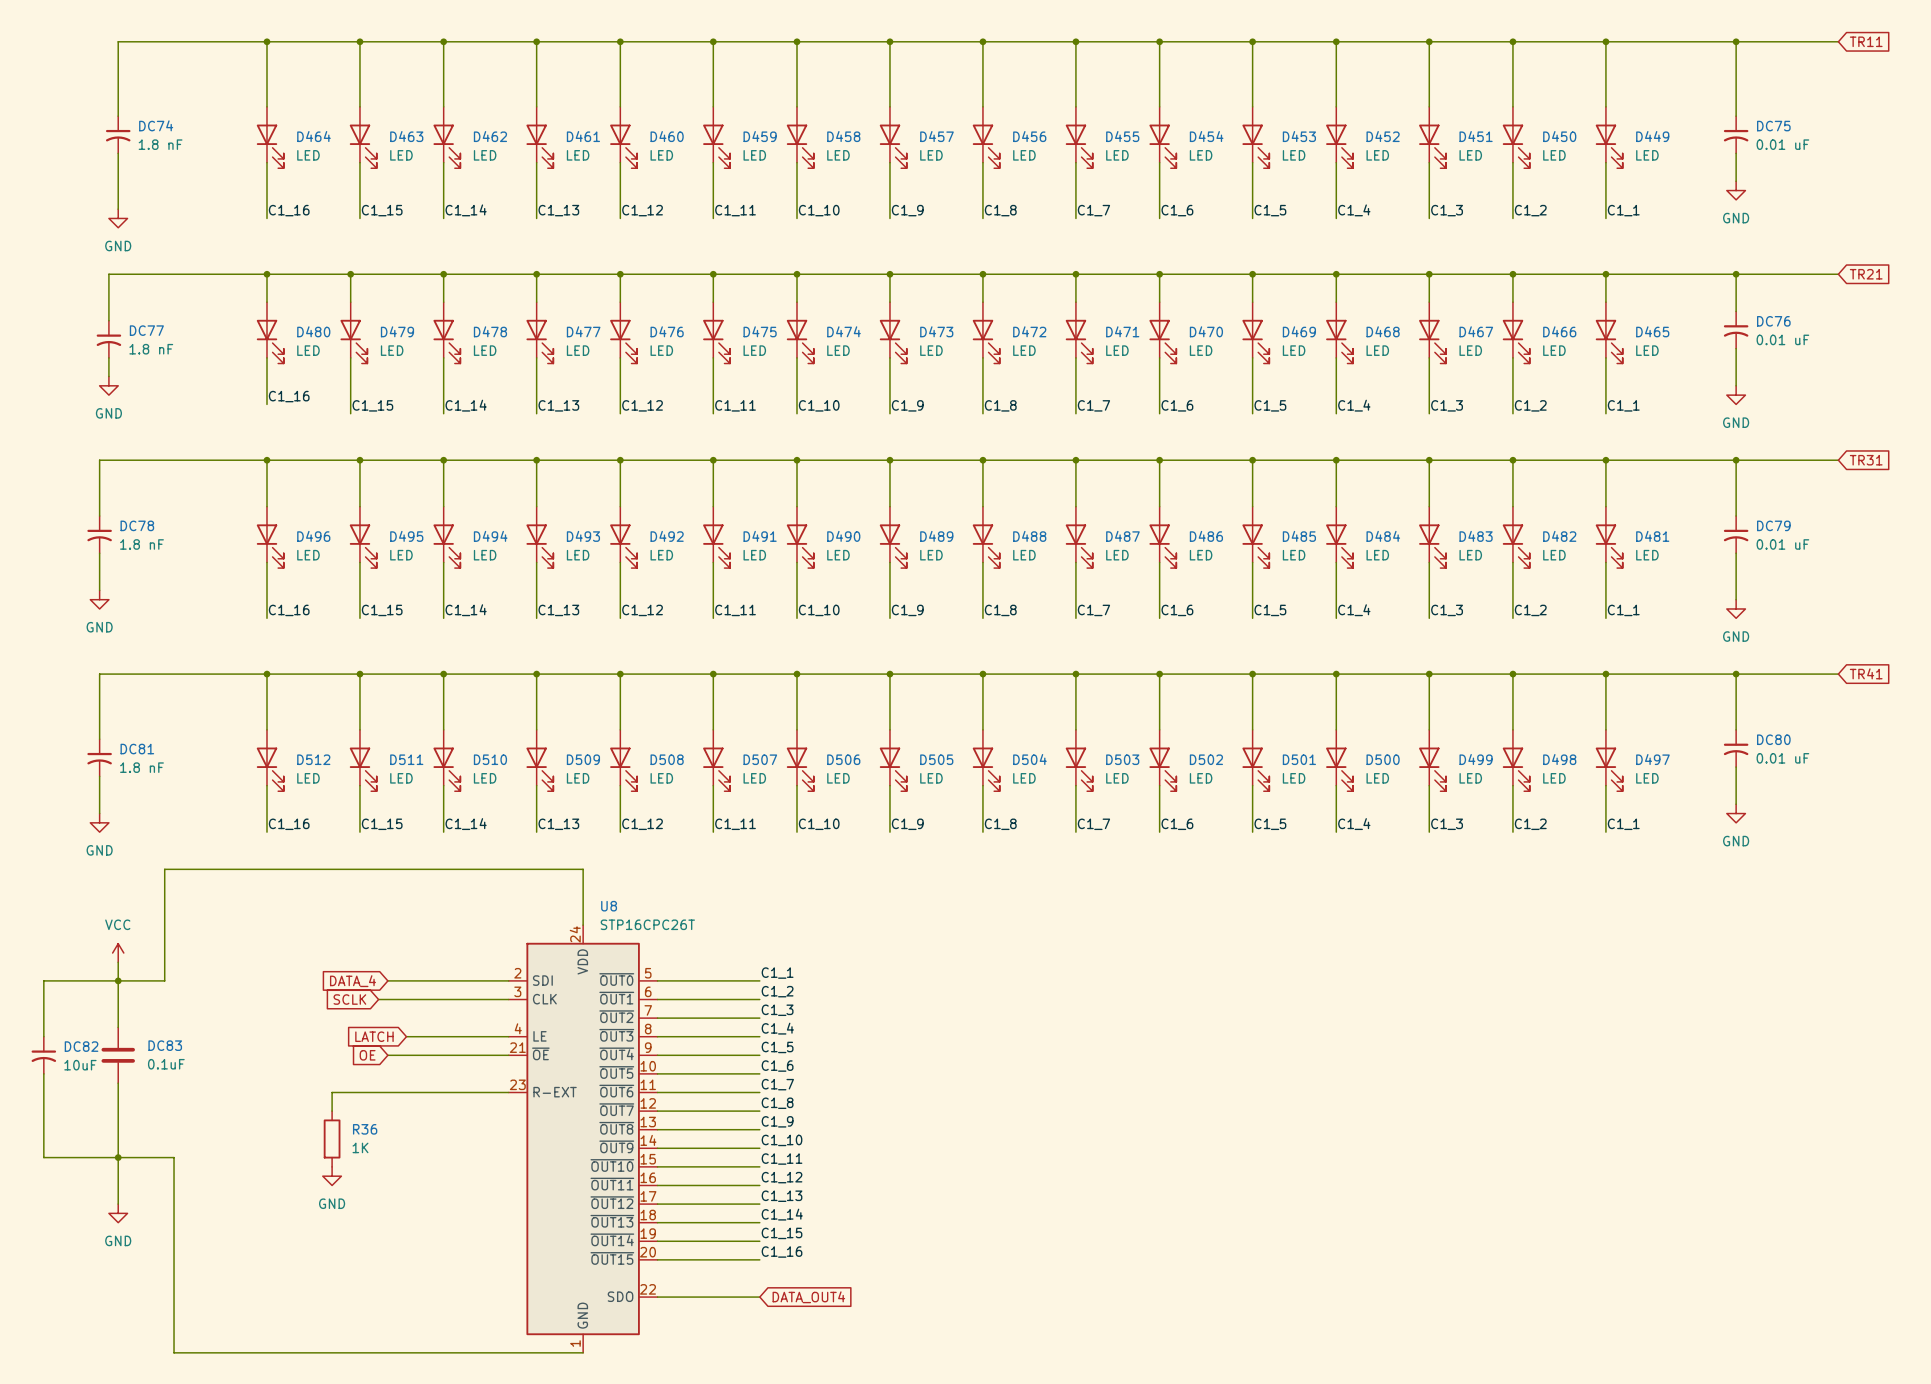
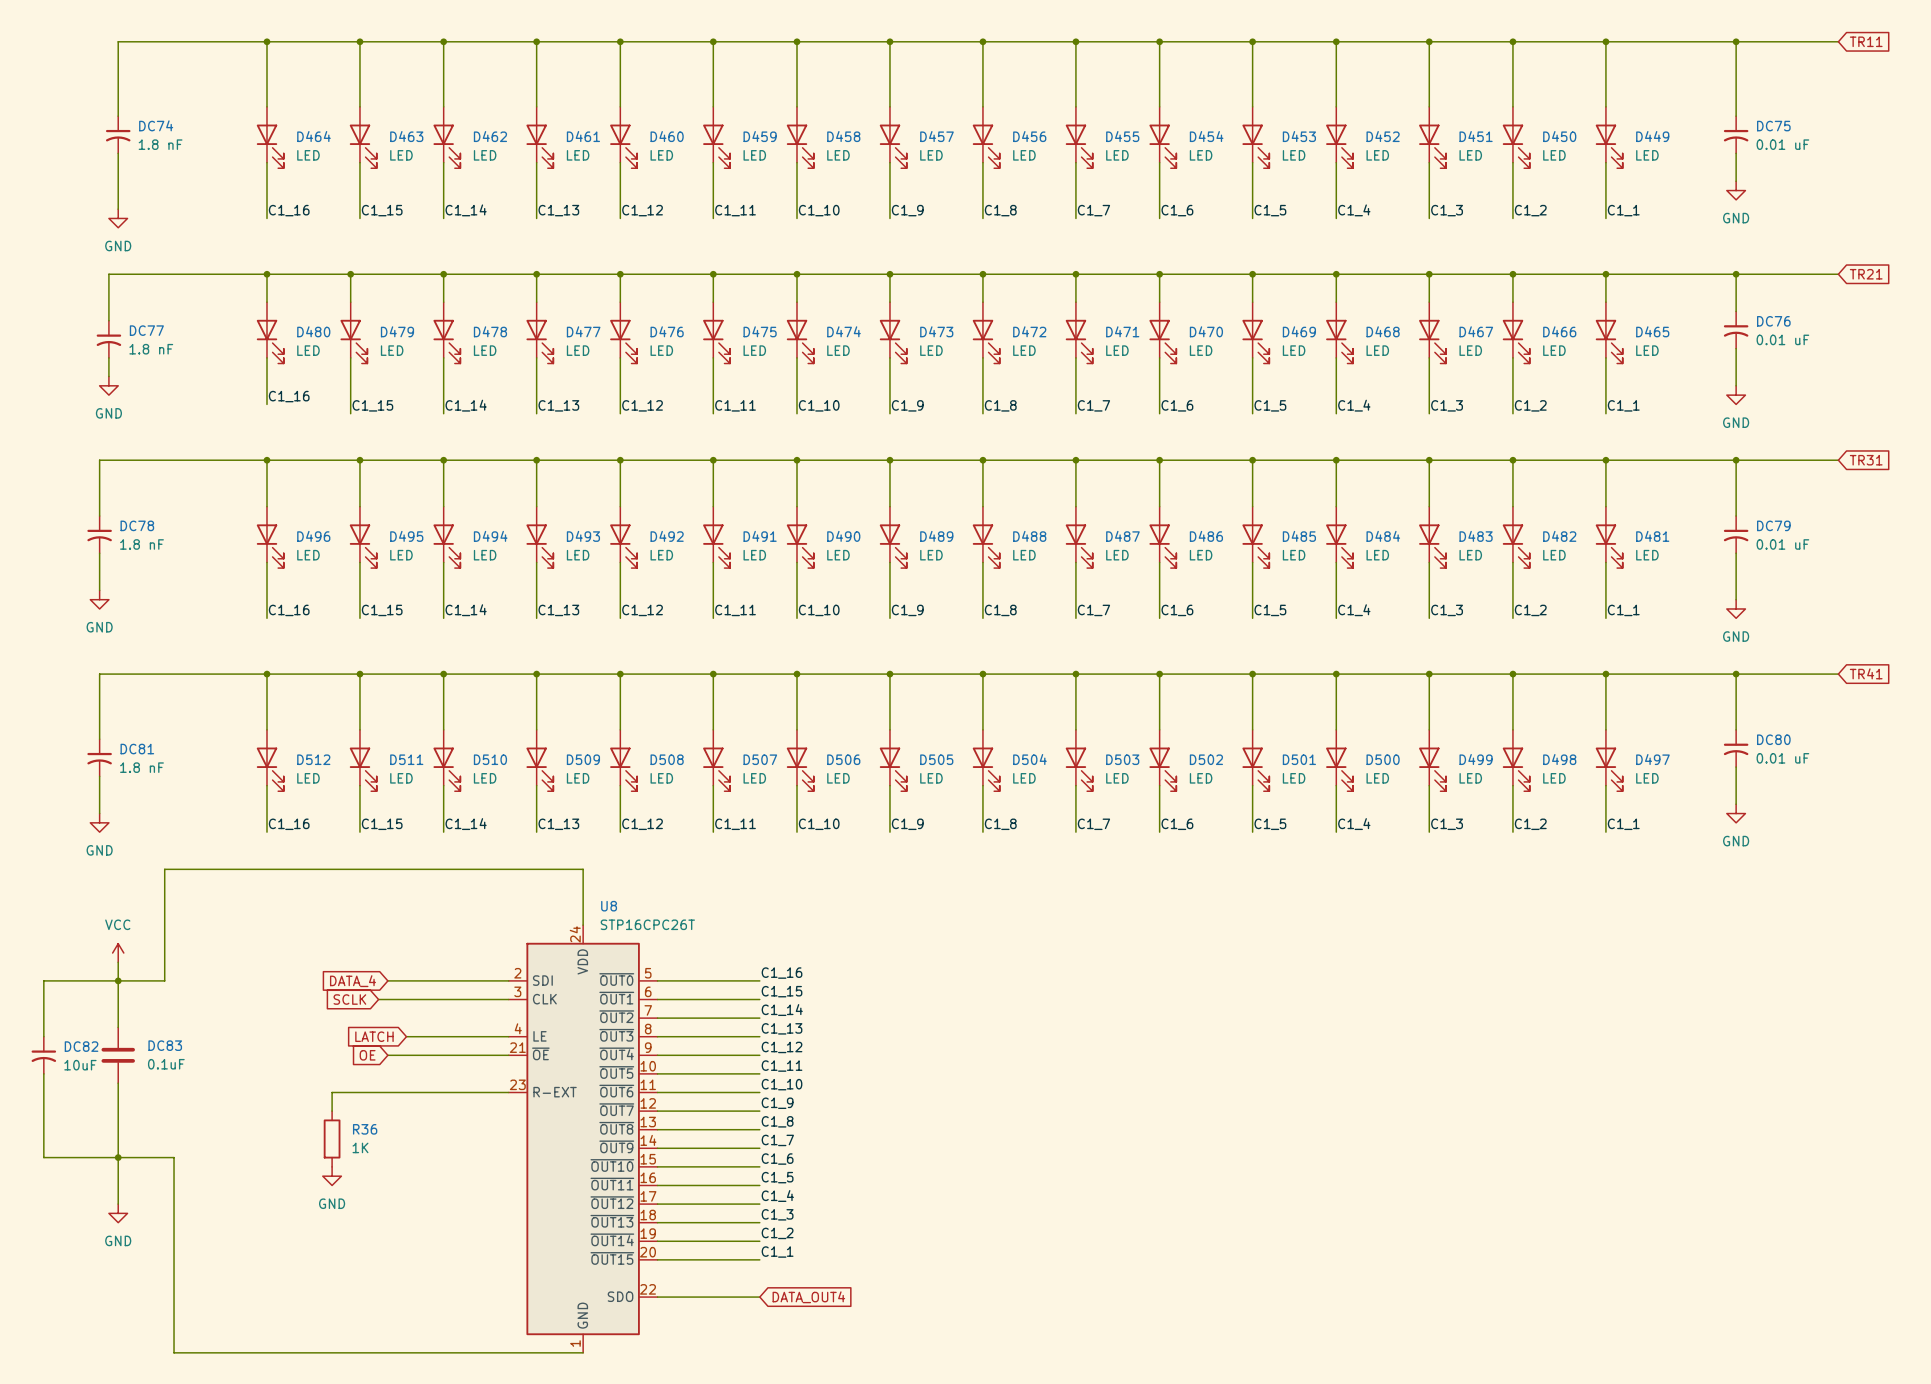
label: C1_1 (777, 973) -> C1_16 (782, 973)
label: C1_2 (777, 991) -> C1_15 (782, 991)
label: C1_3 (777, 1010) -> C1_14 (782, 1010)
label: C1_4 (777, 1028) -> C1_13 (782, 1028)
label: C1_5 (777, 1047) -> C1_12 (782, 1047)
label: C1_6 (777, 1066) -> C1_11 (782, 1066)
label: C1_7 (777, 1084) -> C1_10 (782, 1084)
label: C1_8 (777, 1103) -> C1_9 (777, 1103)
label: C1_9 (777, 1121) -> C1_8 (777, 1121)
label: C1_10 (782, 1140) -> C1_7 (777, 1140)
label: C1_11 (782, 1159) -> C1_6 (777, 1159)
label: C1_12 (782, 1177) -> C1_5 (777, 1177)
label: C1_13 (782, 1196) -> C1_4 (777, 1196)
label: C1_14 (782, 1214) -> C1_3 (777, 1214)
label: C1_15 (782, 1233) -> C1_2 (777, 1233)
label: C1_16 (782, 1252) -> C1_1 (777, 1252)

